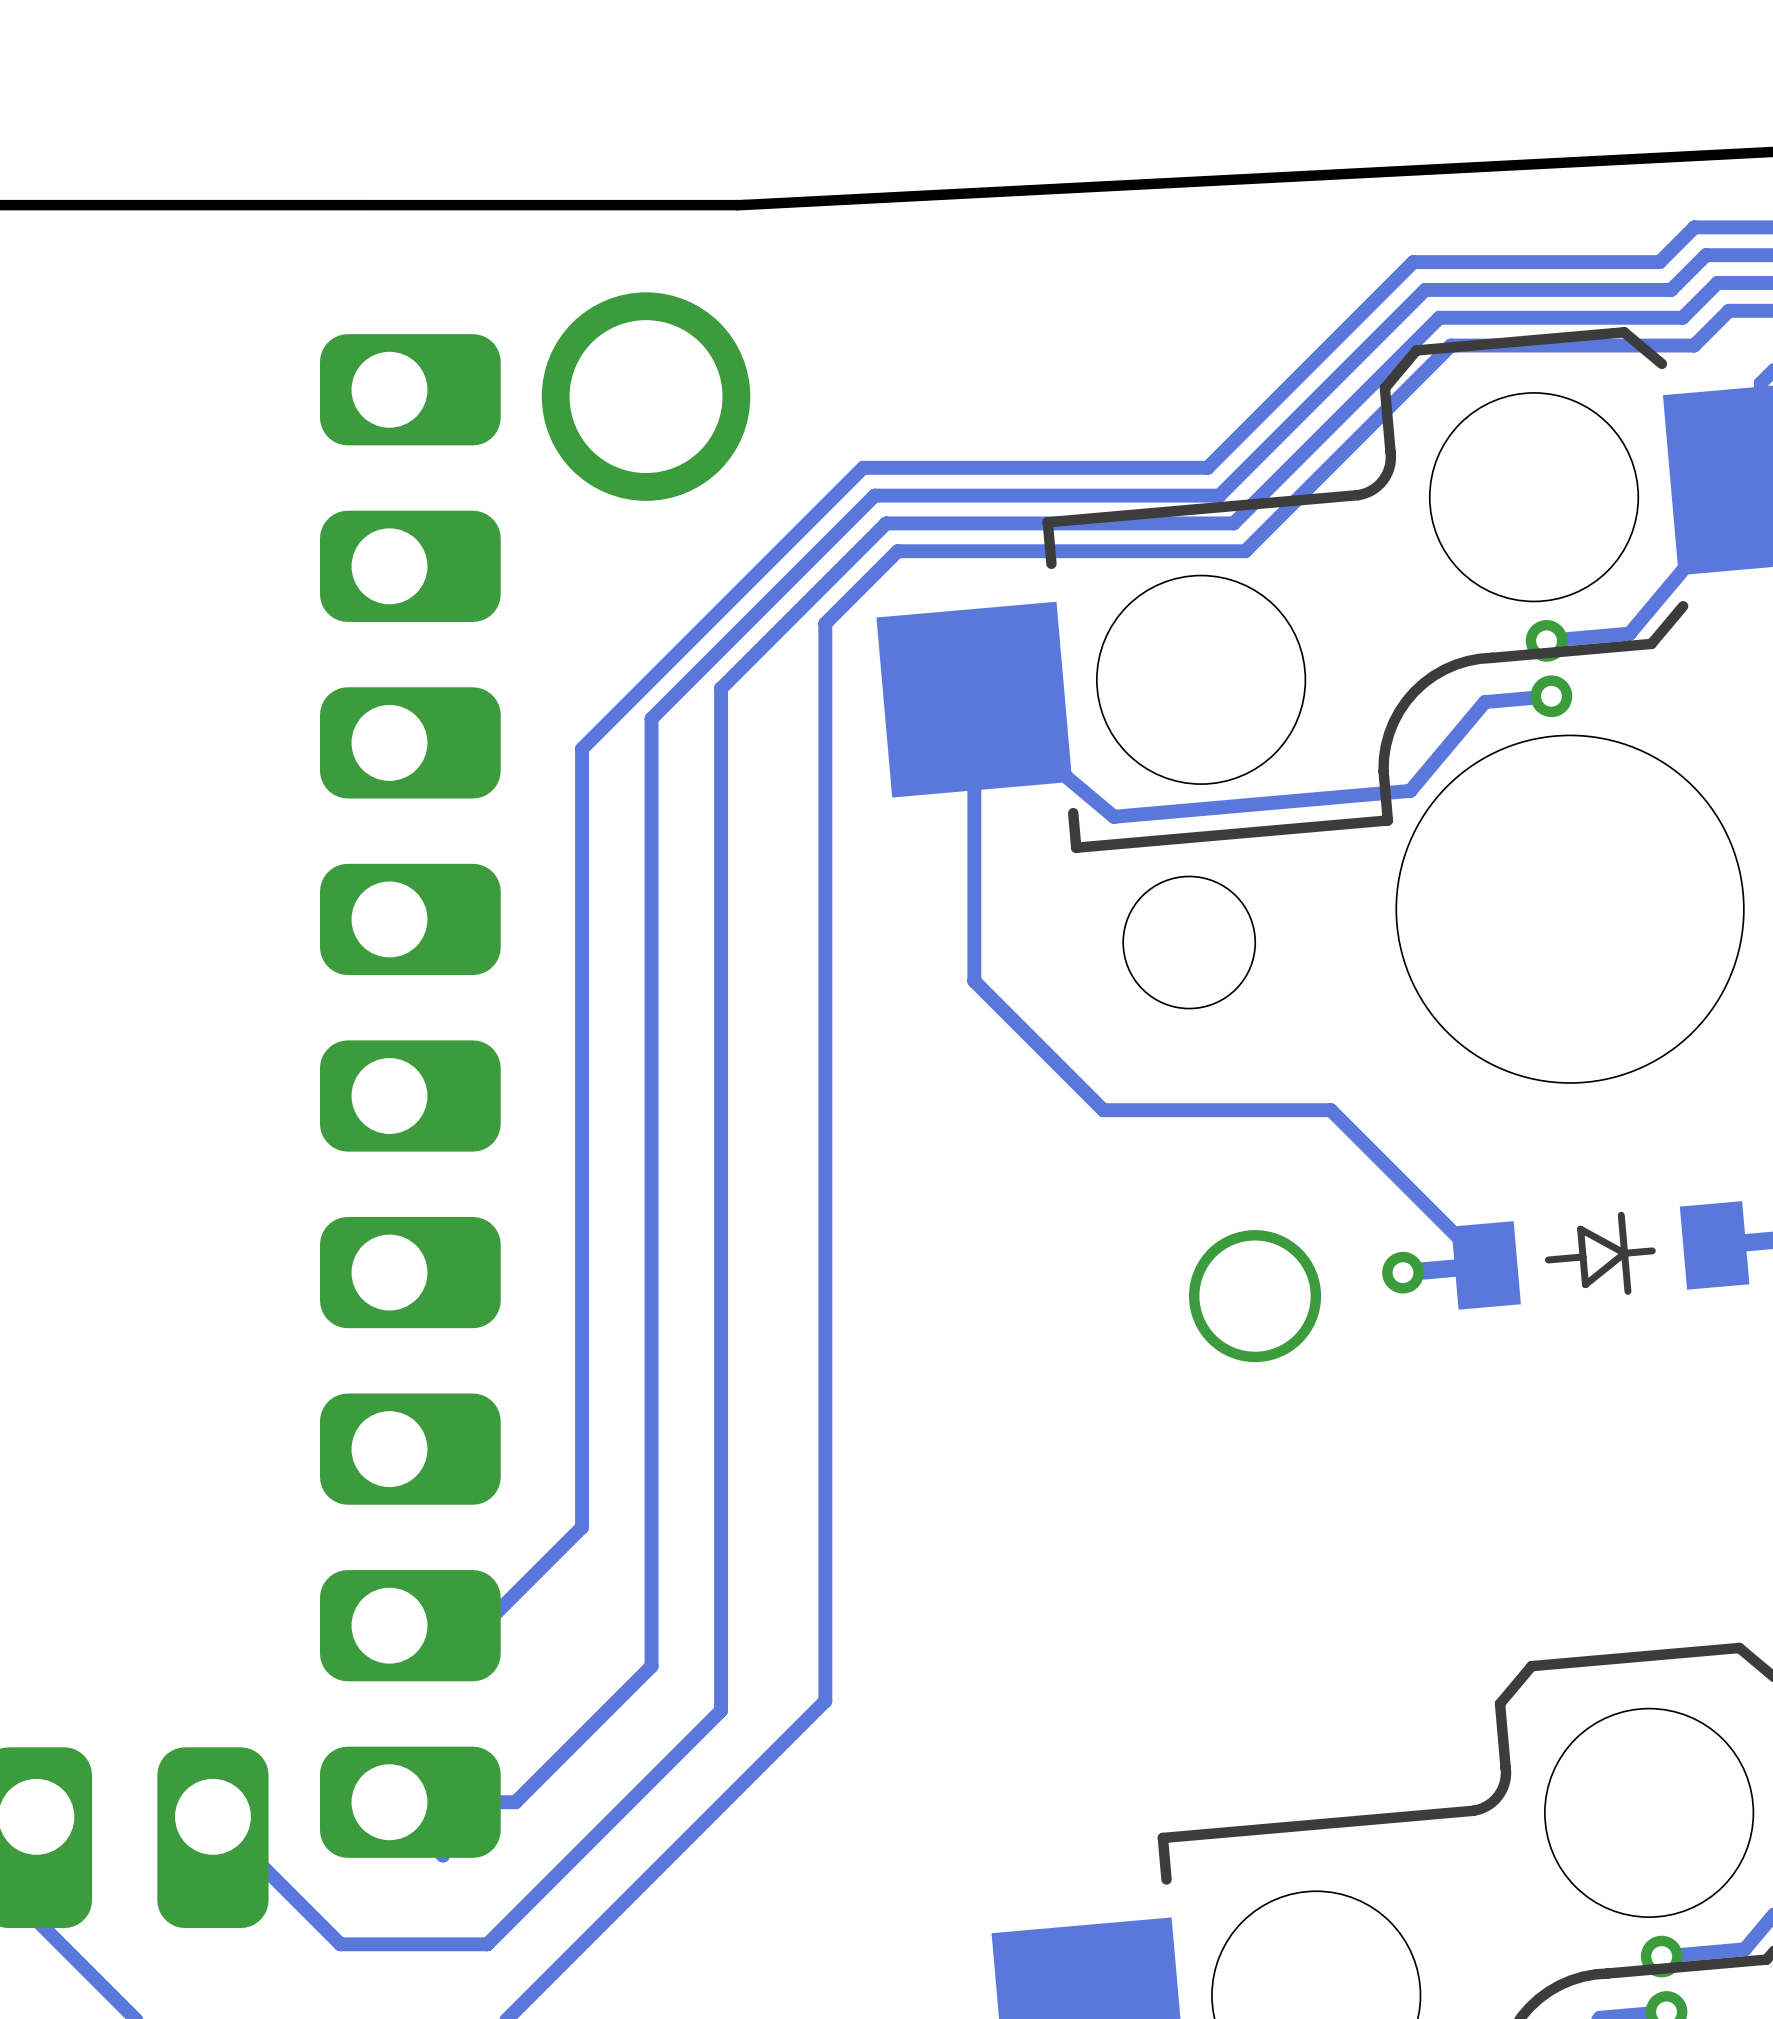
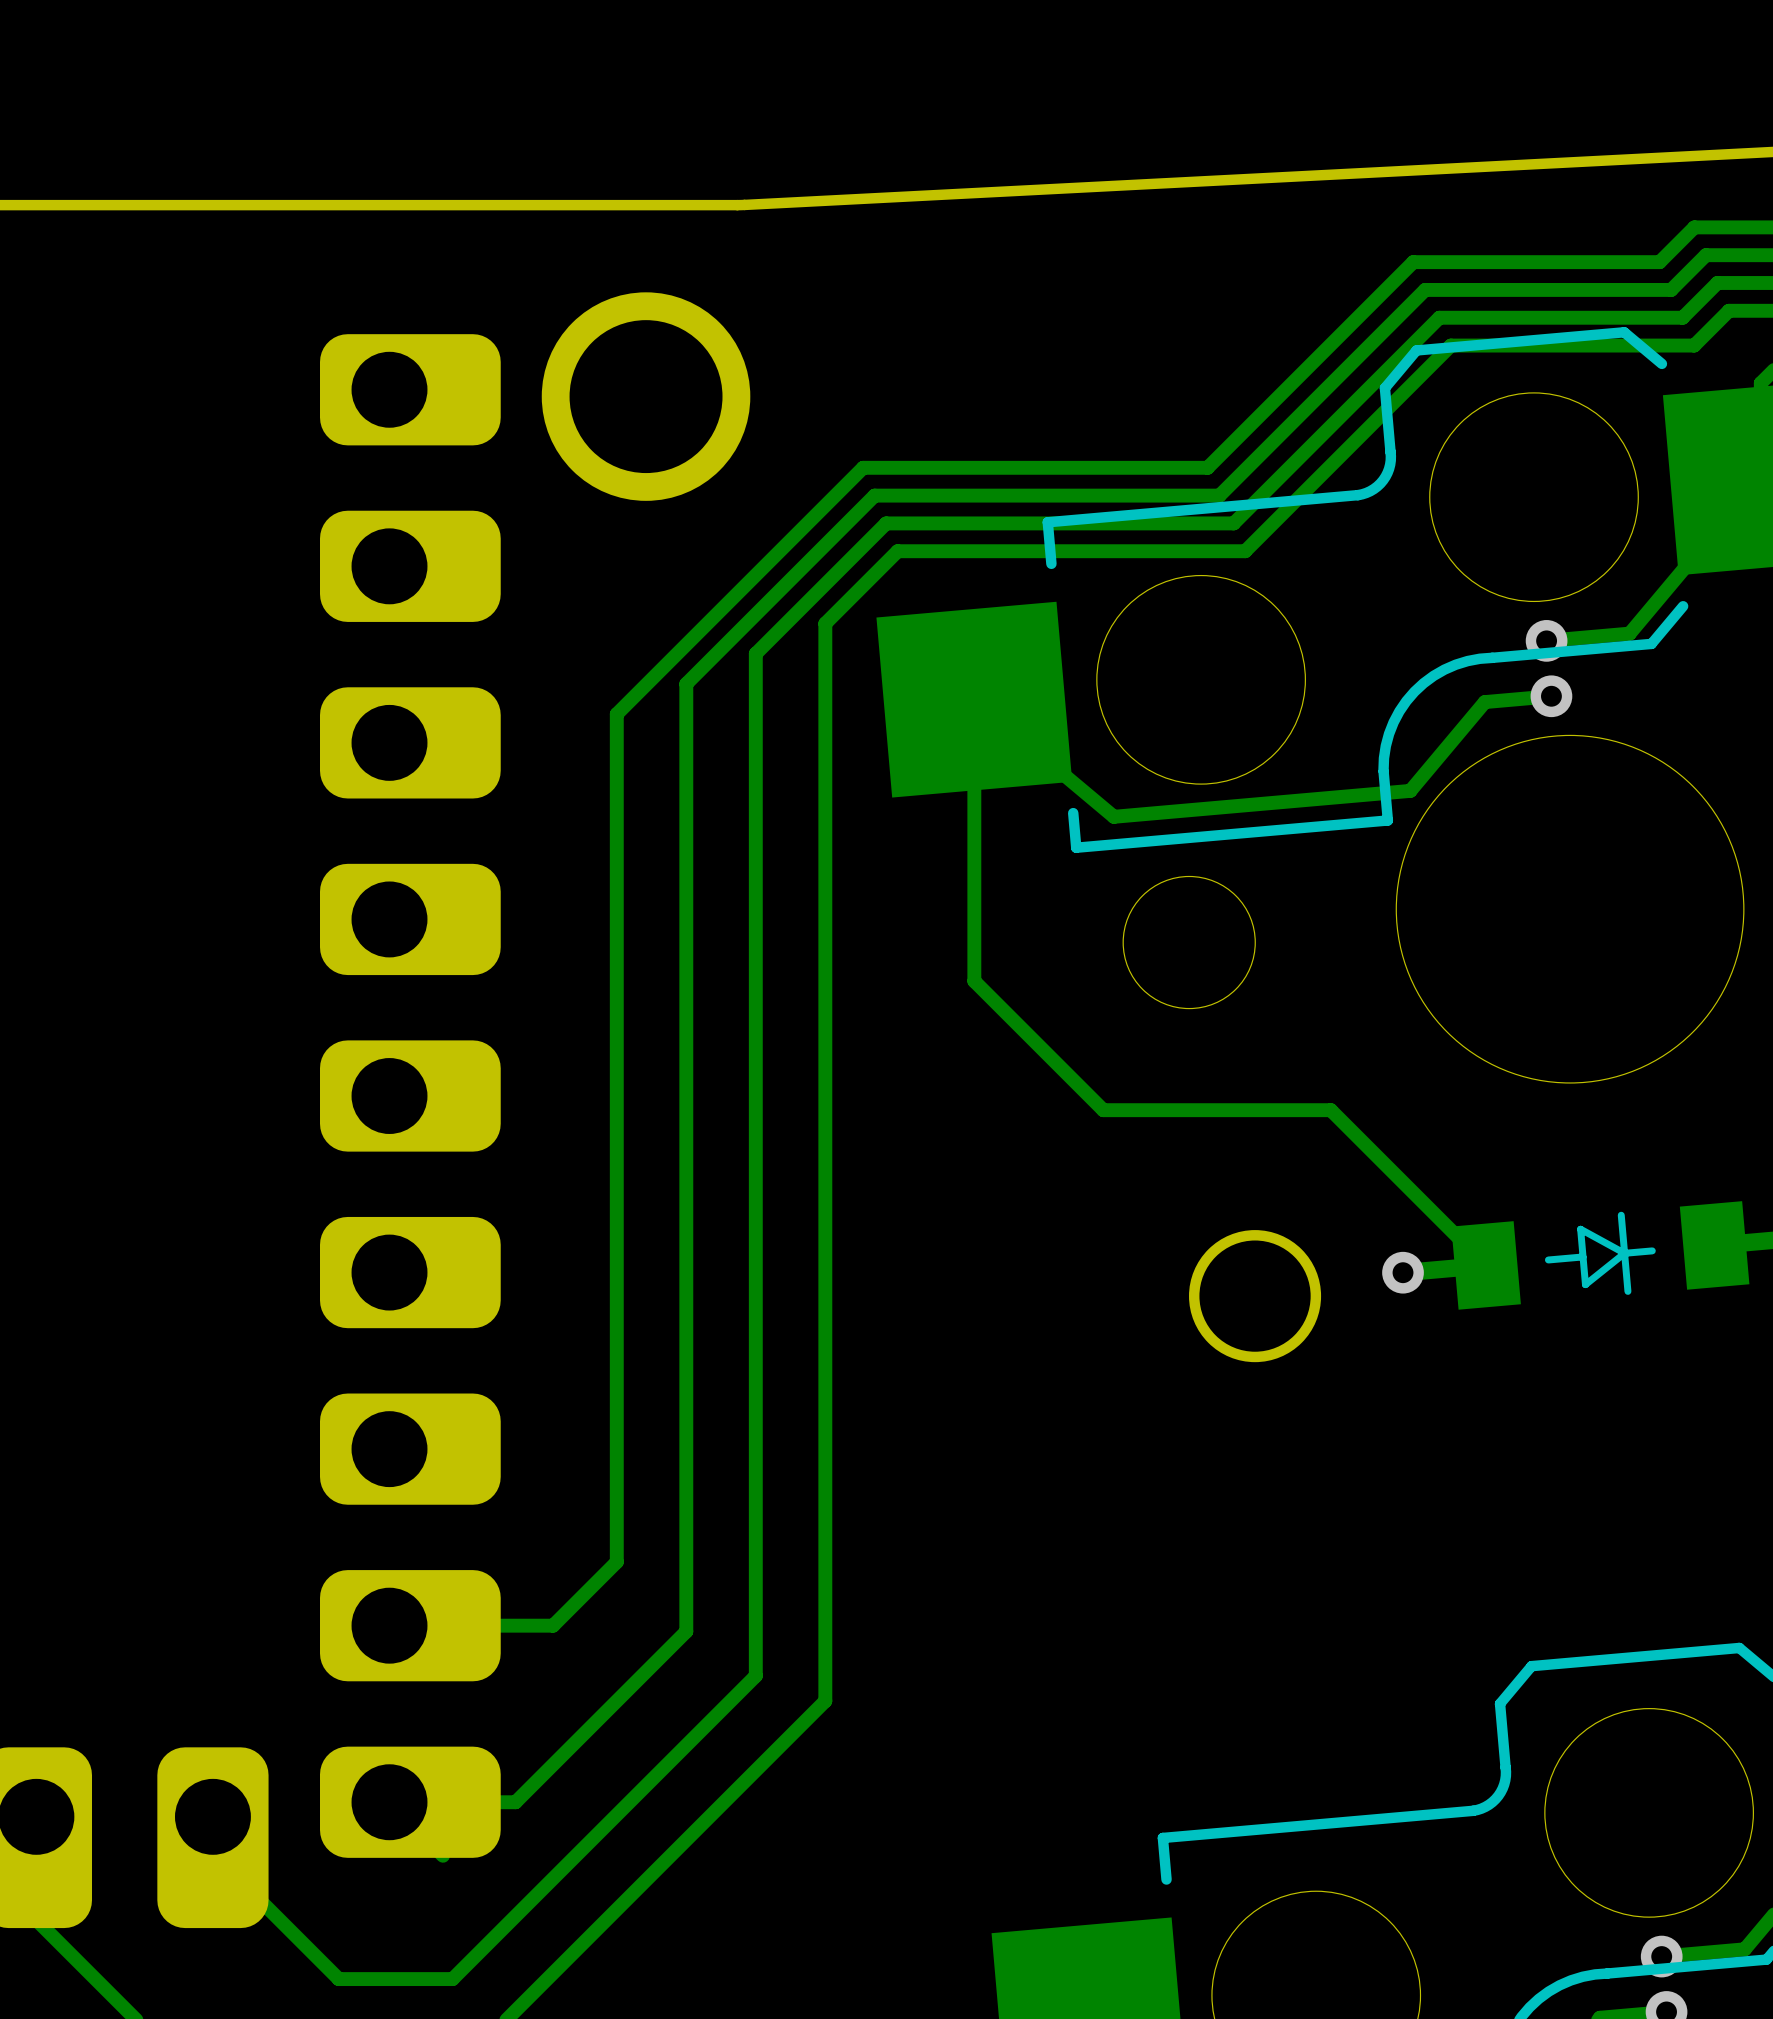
track: (755, 653) (721, 688) (721, 1710) -> (755, 653) (755, 1675) (721, 1710)
track: (686, 683) (651, 718) (651, 1666) -> (686, 683) (686, 1631) (651, 1666)
track: (616, 714) (582, 748) (582, 1527) (483, 1625) -> (616, 714) (616, 1562) (553, 1625) (483, 1625)
track: (212, 1816) (340, 1944) (487, 1944) -> (212, 1816) (212, 1853) (338, 1979) (452, 1979) (487, 1944)

